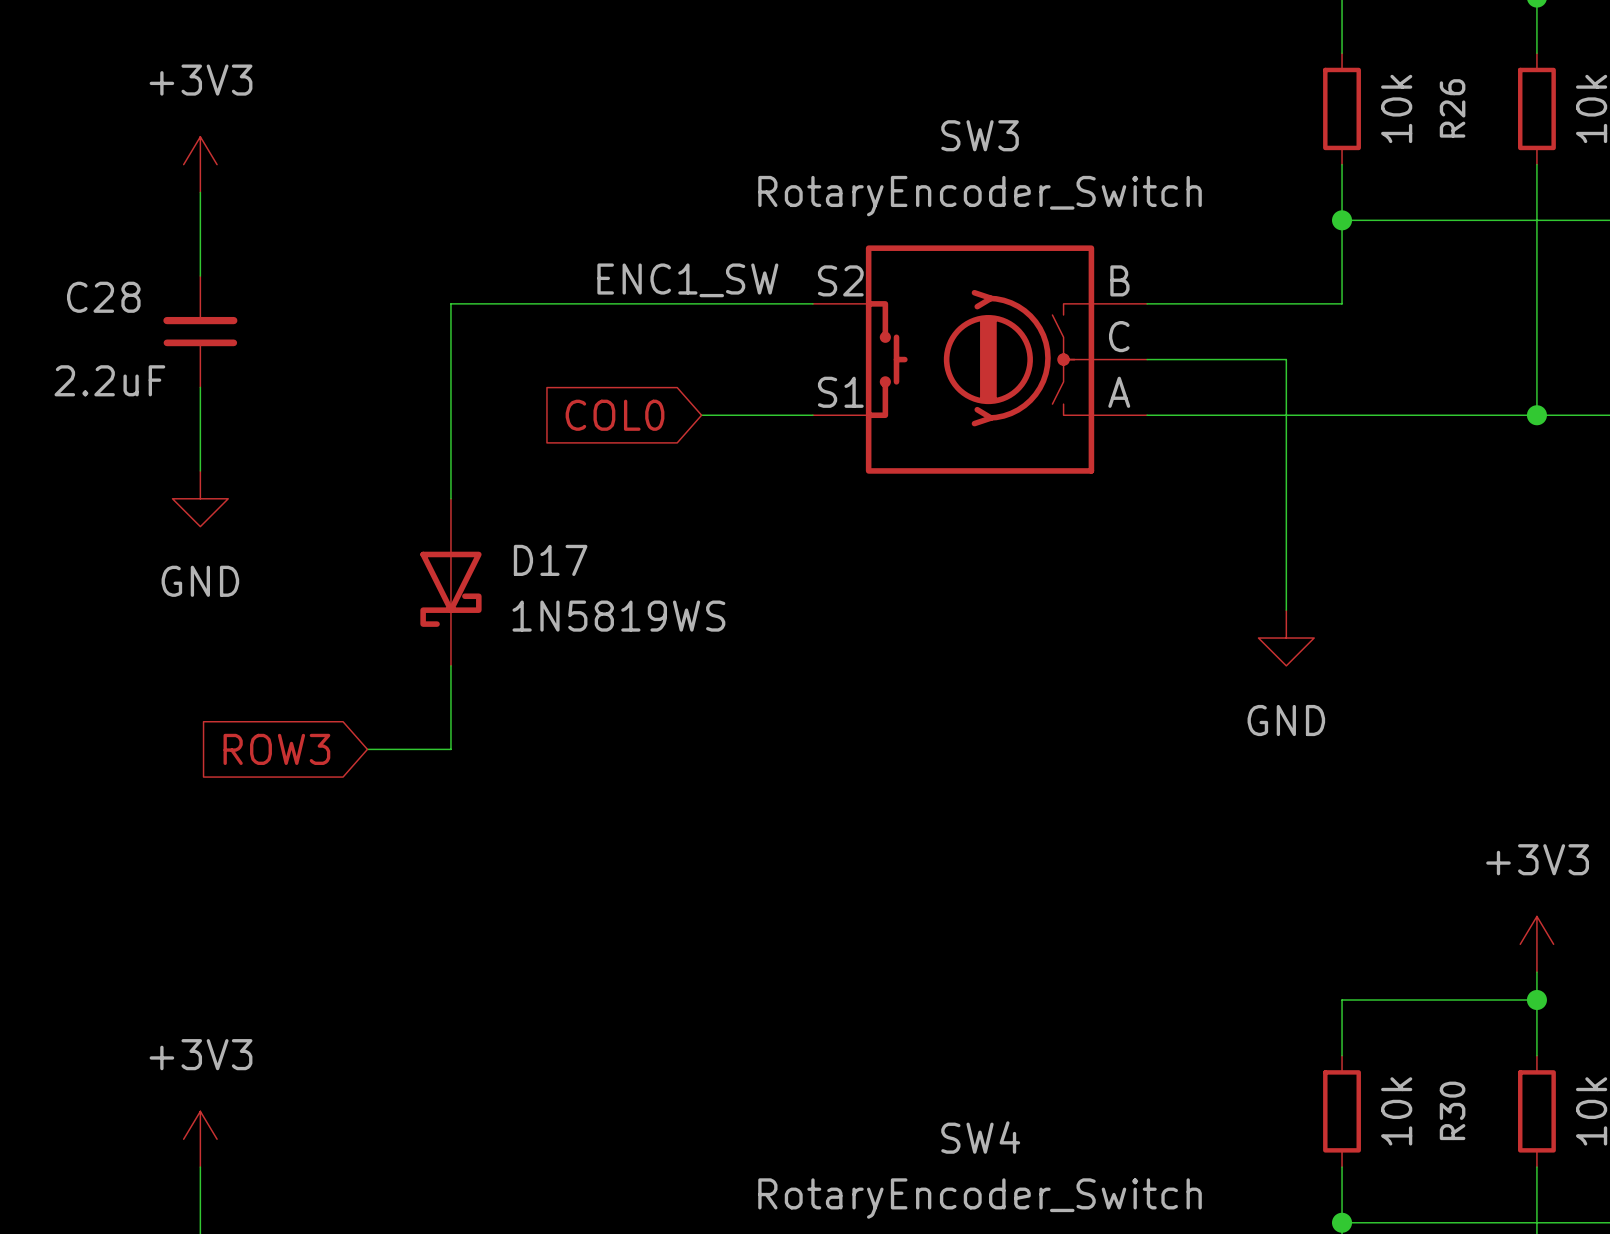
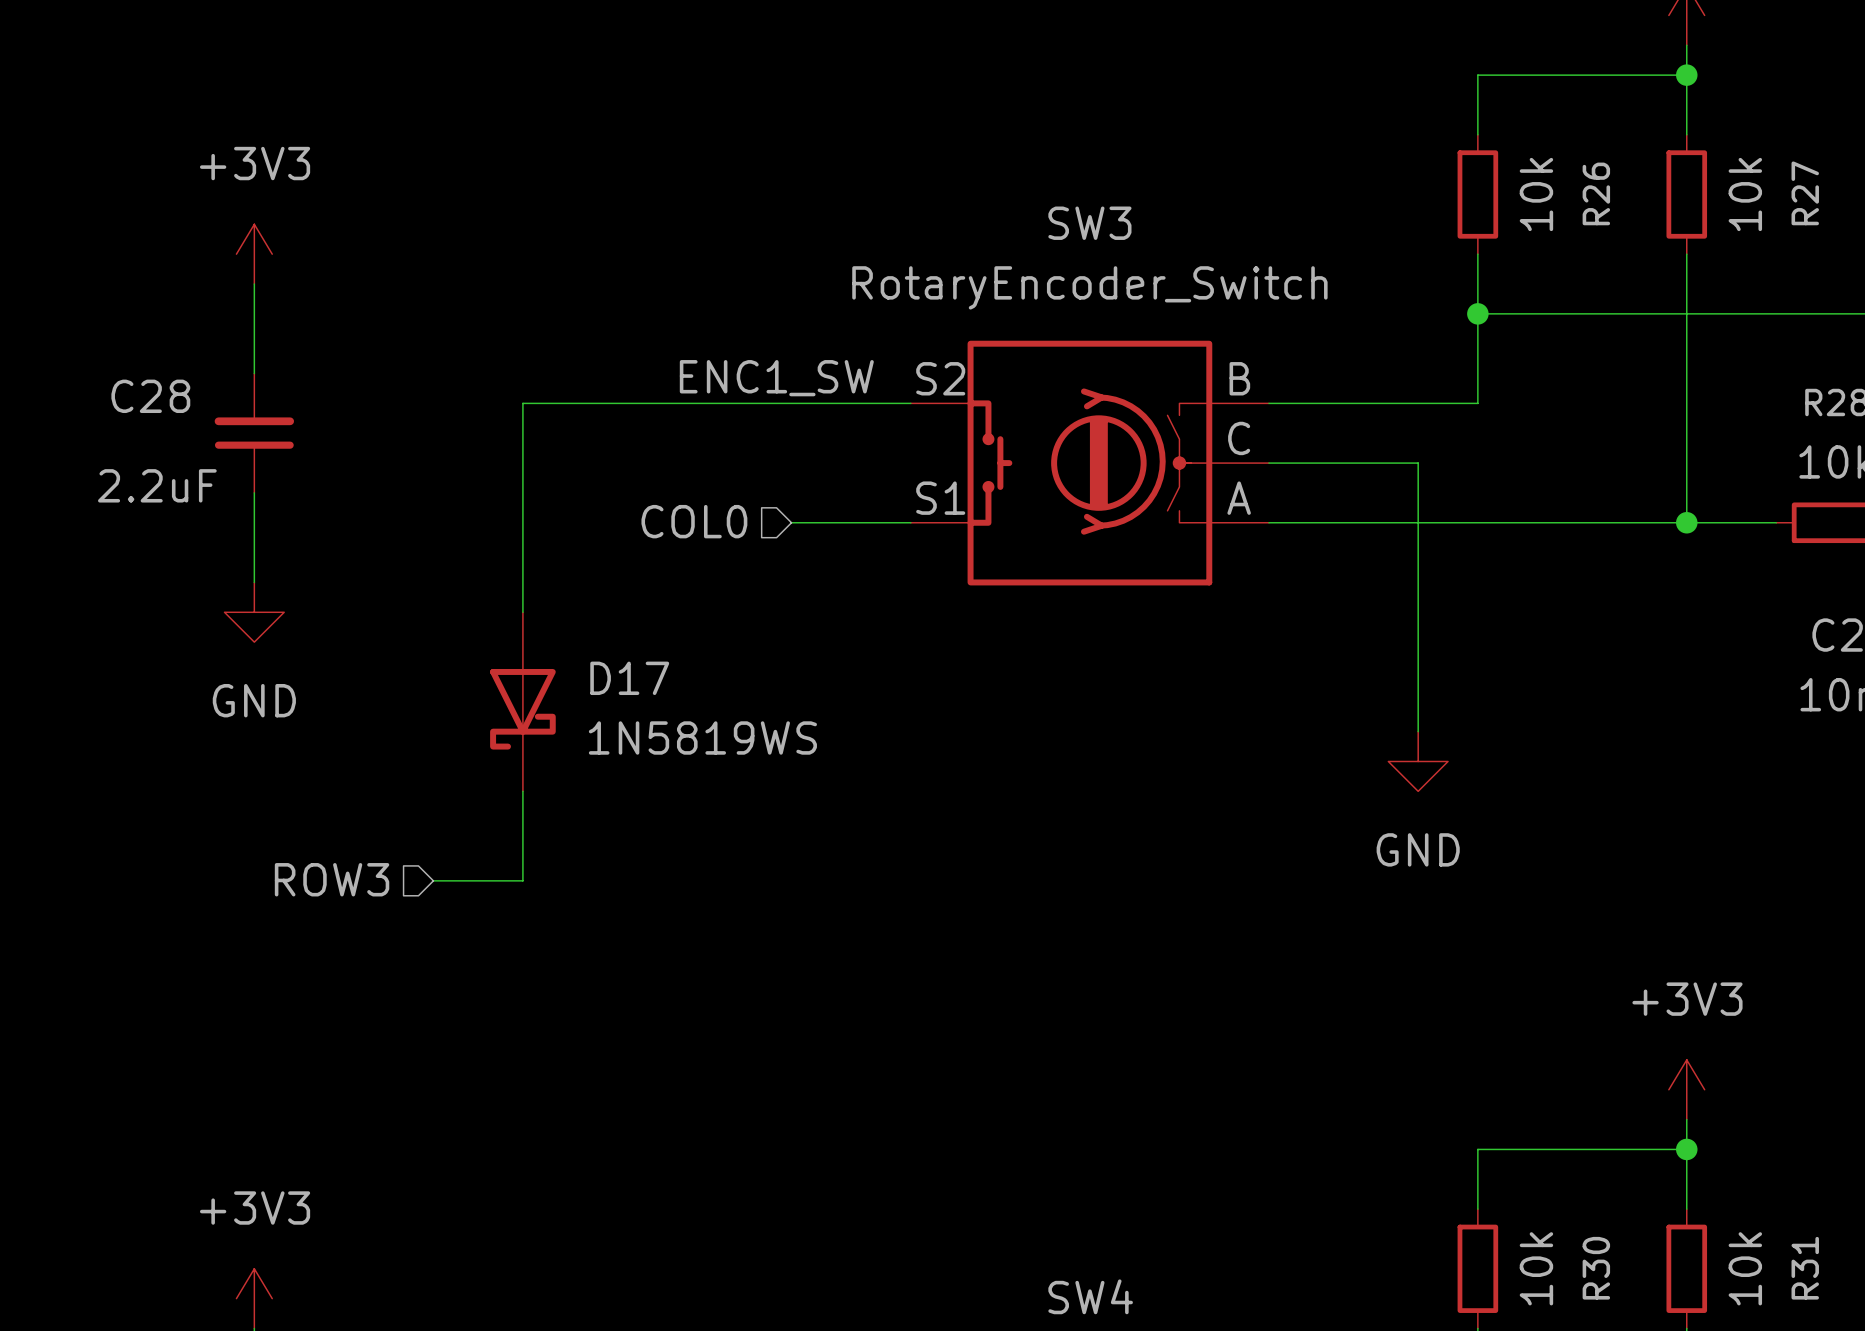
hierarchical label: none -> COL0 (694, 521)
global label: COL0 (615, 415) -> none
hierarchical label: none -> ROW3 (332, 879)
global label: ROW3 (276, 749) -> none

